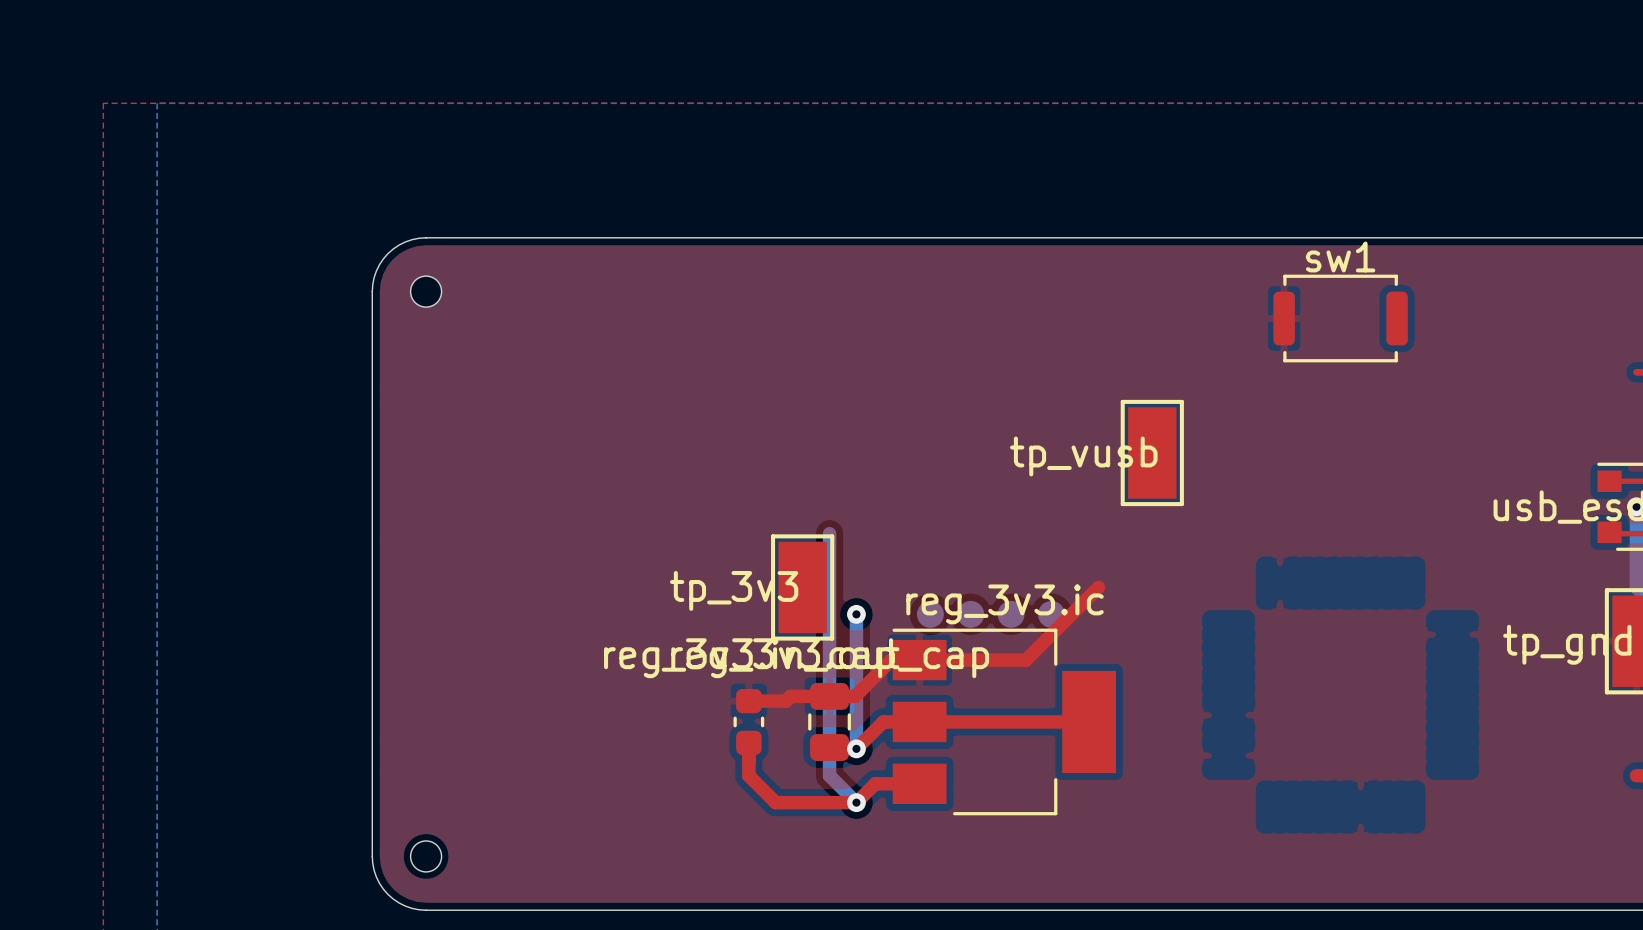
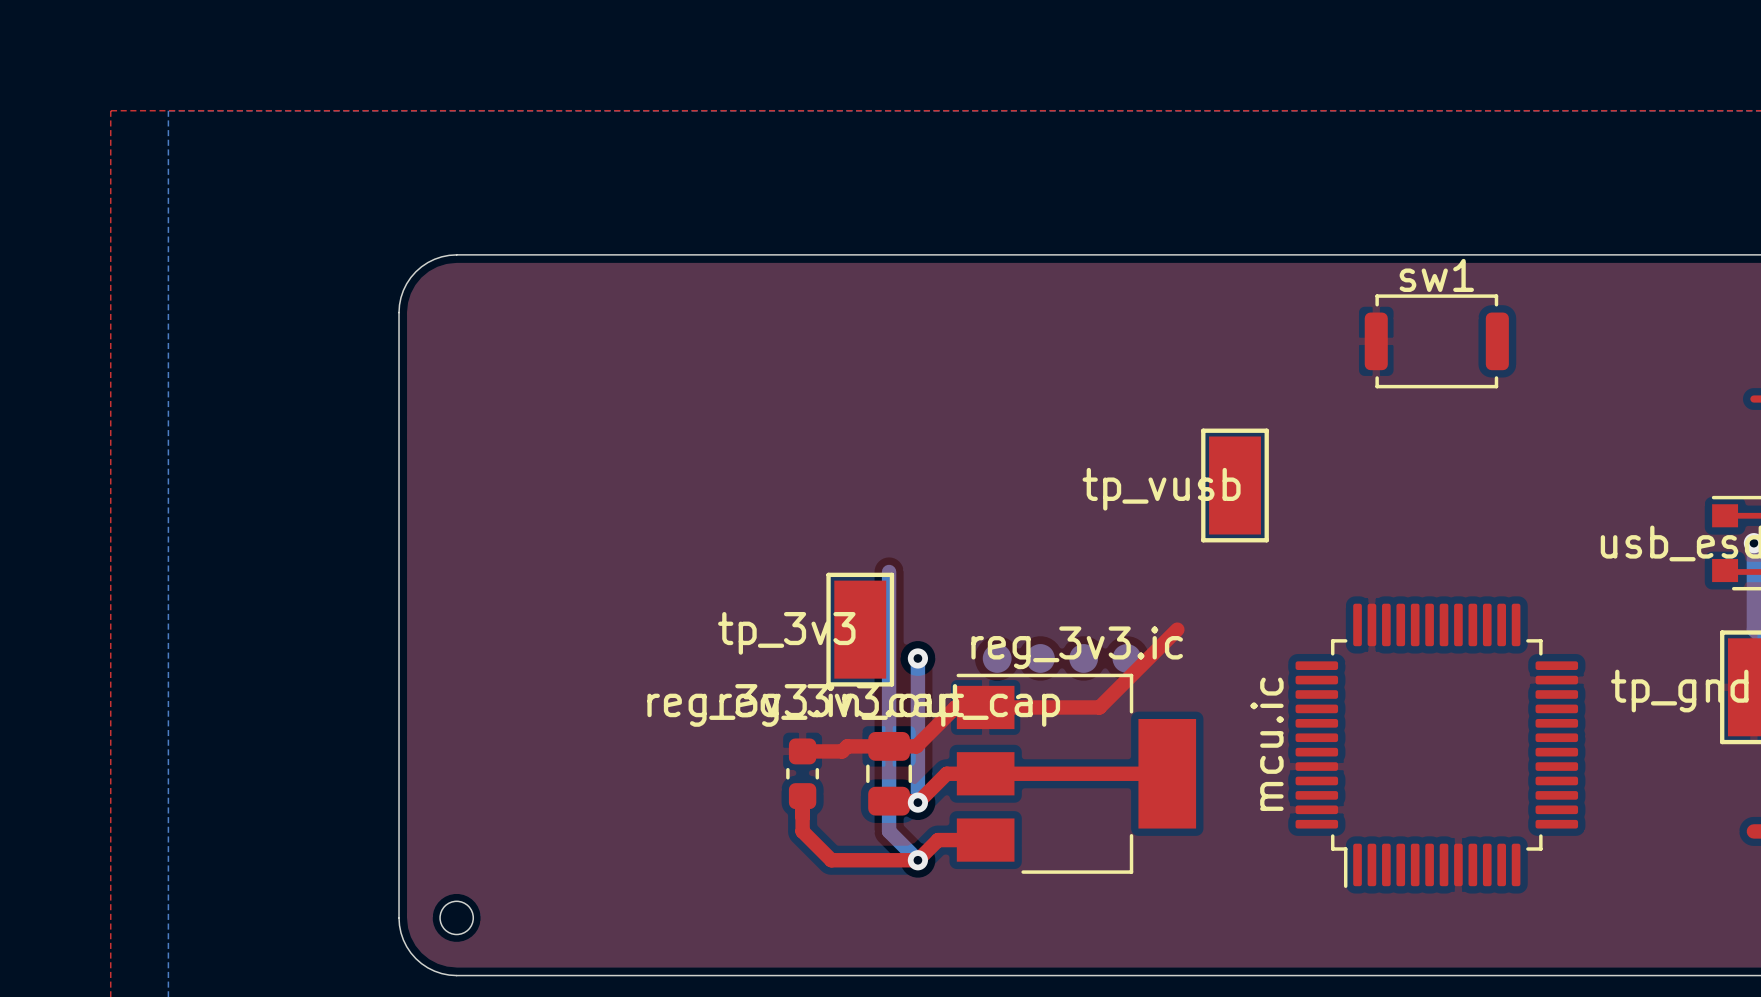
part: (426, 291) -> none
mcu.ic: none -> (1436, 745)

